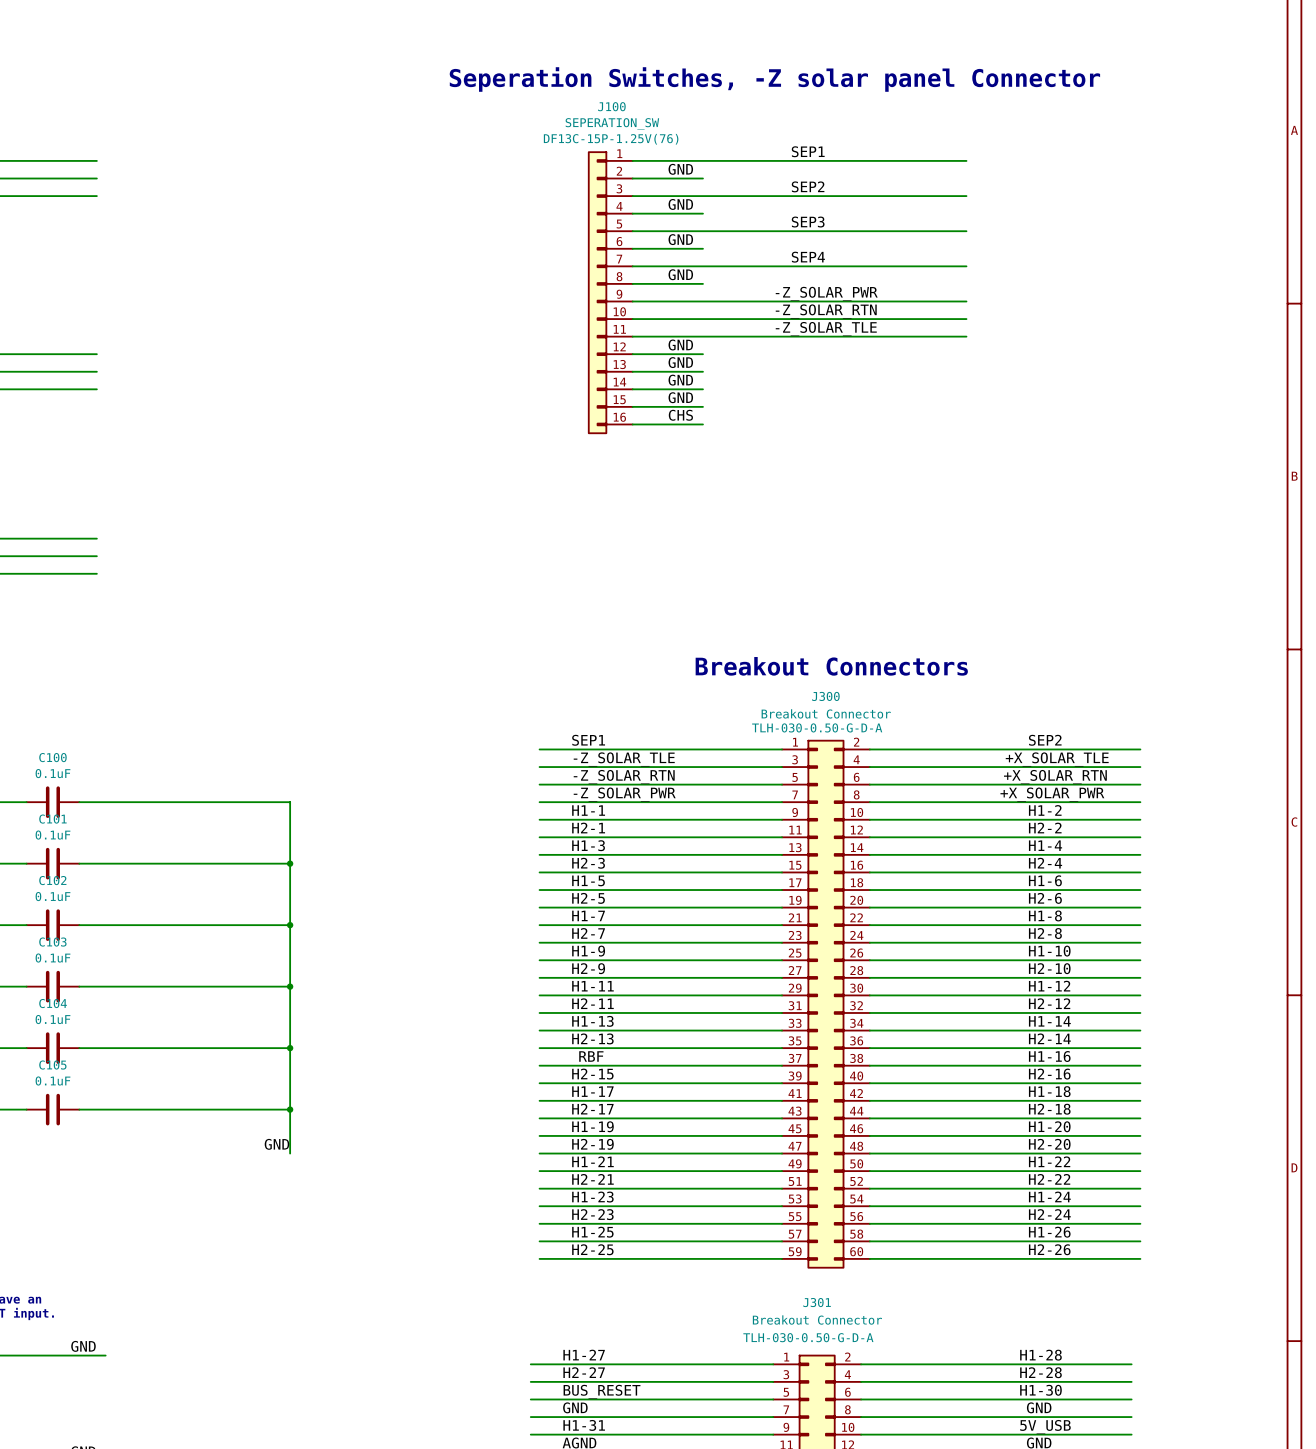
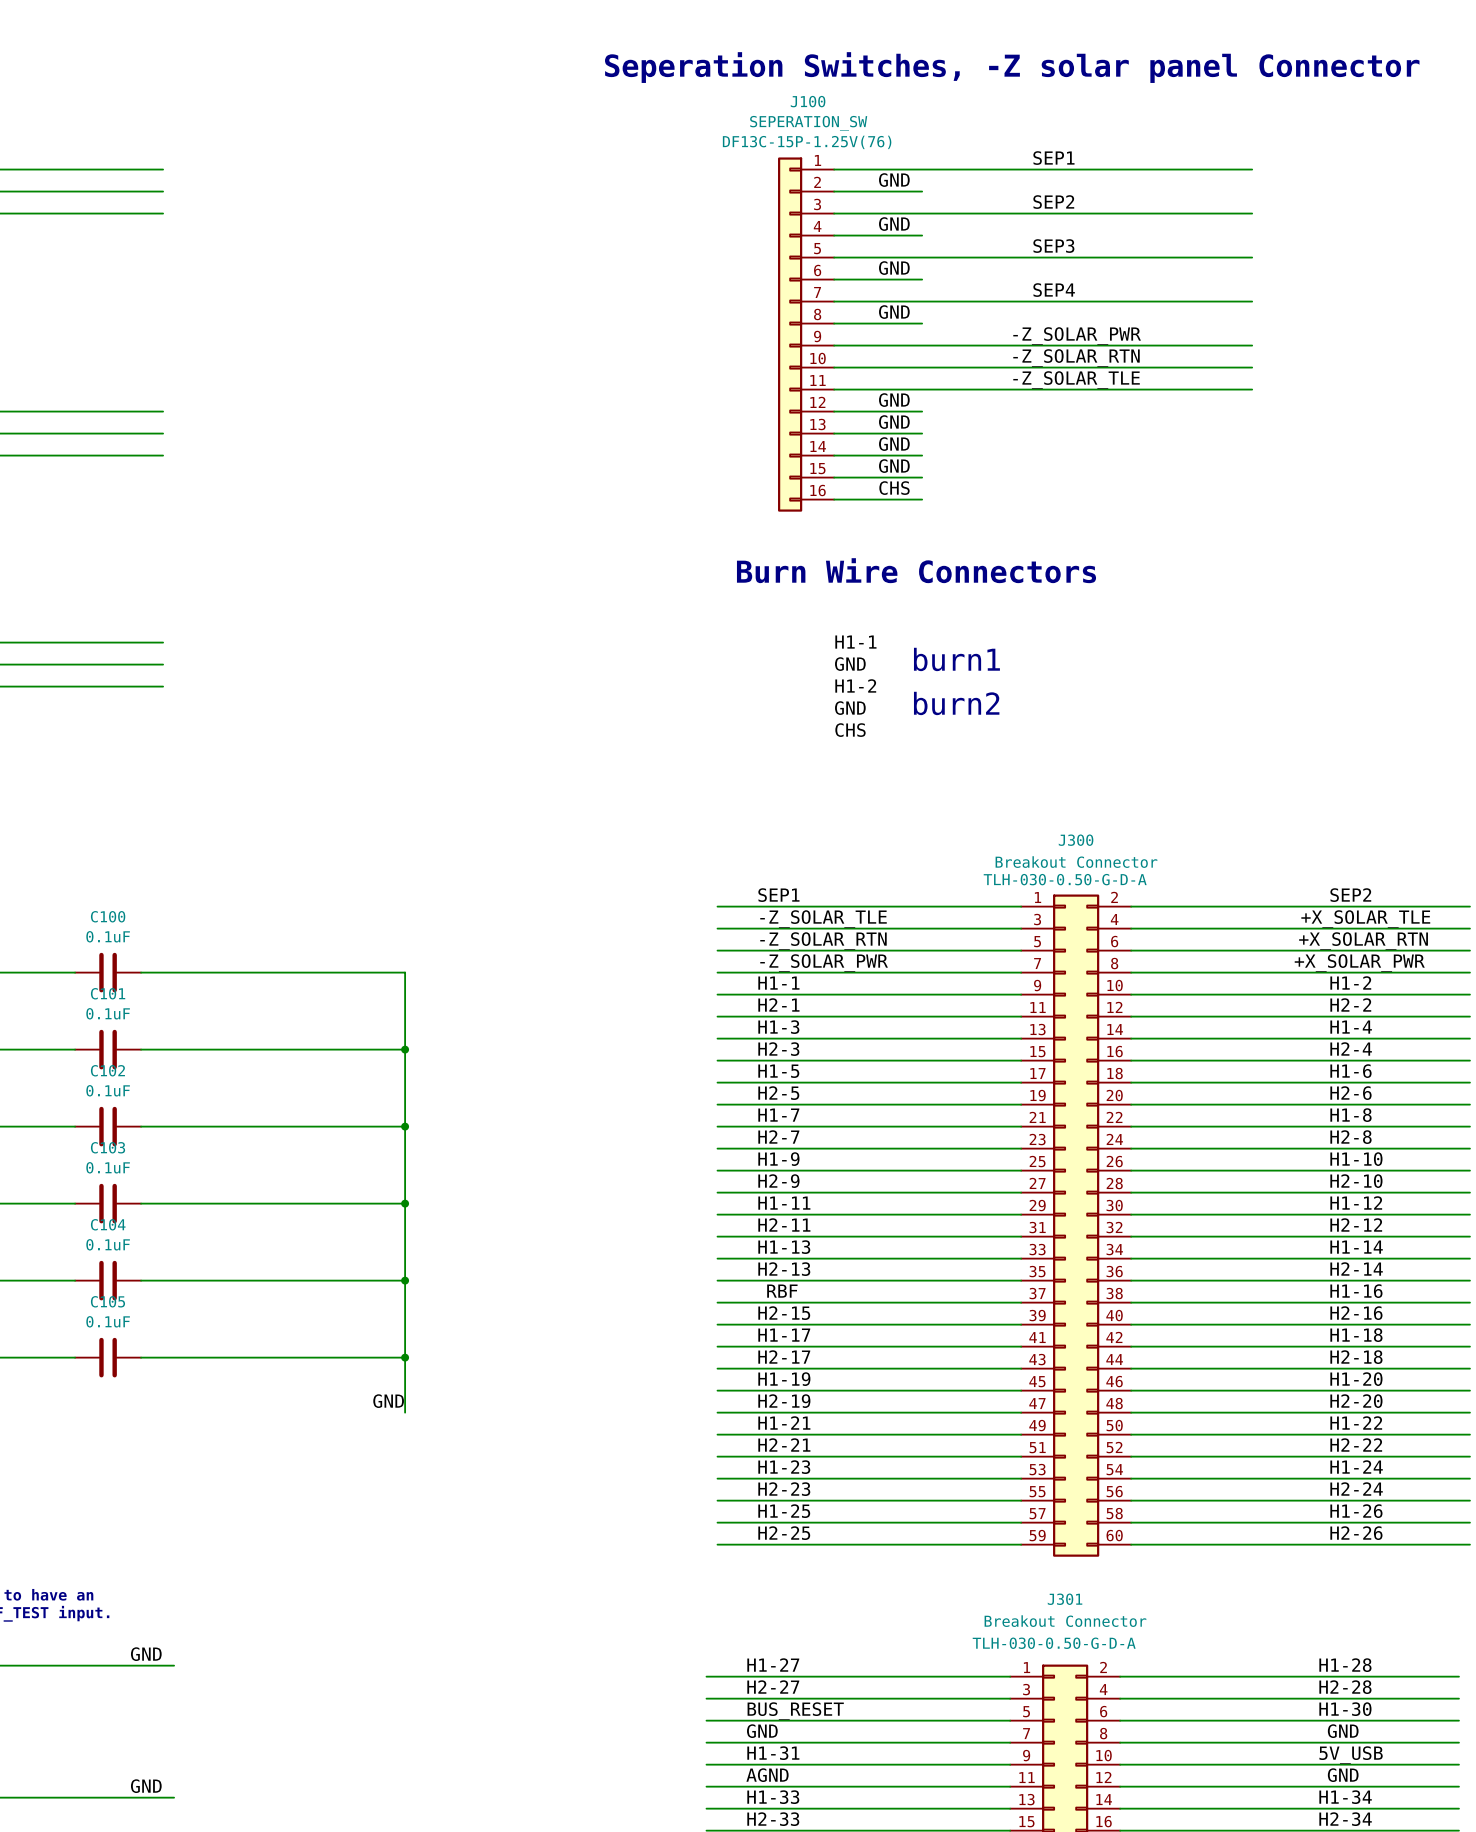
text: none -> Burn Wire Connectors (916, 570)
label: none -> H1-1 (855, 642)
text: none -> burn1 (956, 659)
label: none -> GND (850, 664)
label: none -> H1-2 (855, 685)
text: none -> burn2 (956, 703)
label: none -> GND (850, 708)
label: none -> CHS (850, 730)
text: Breakout Connectors (831, 666) -> none

